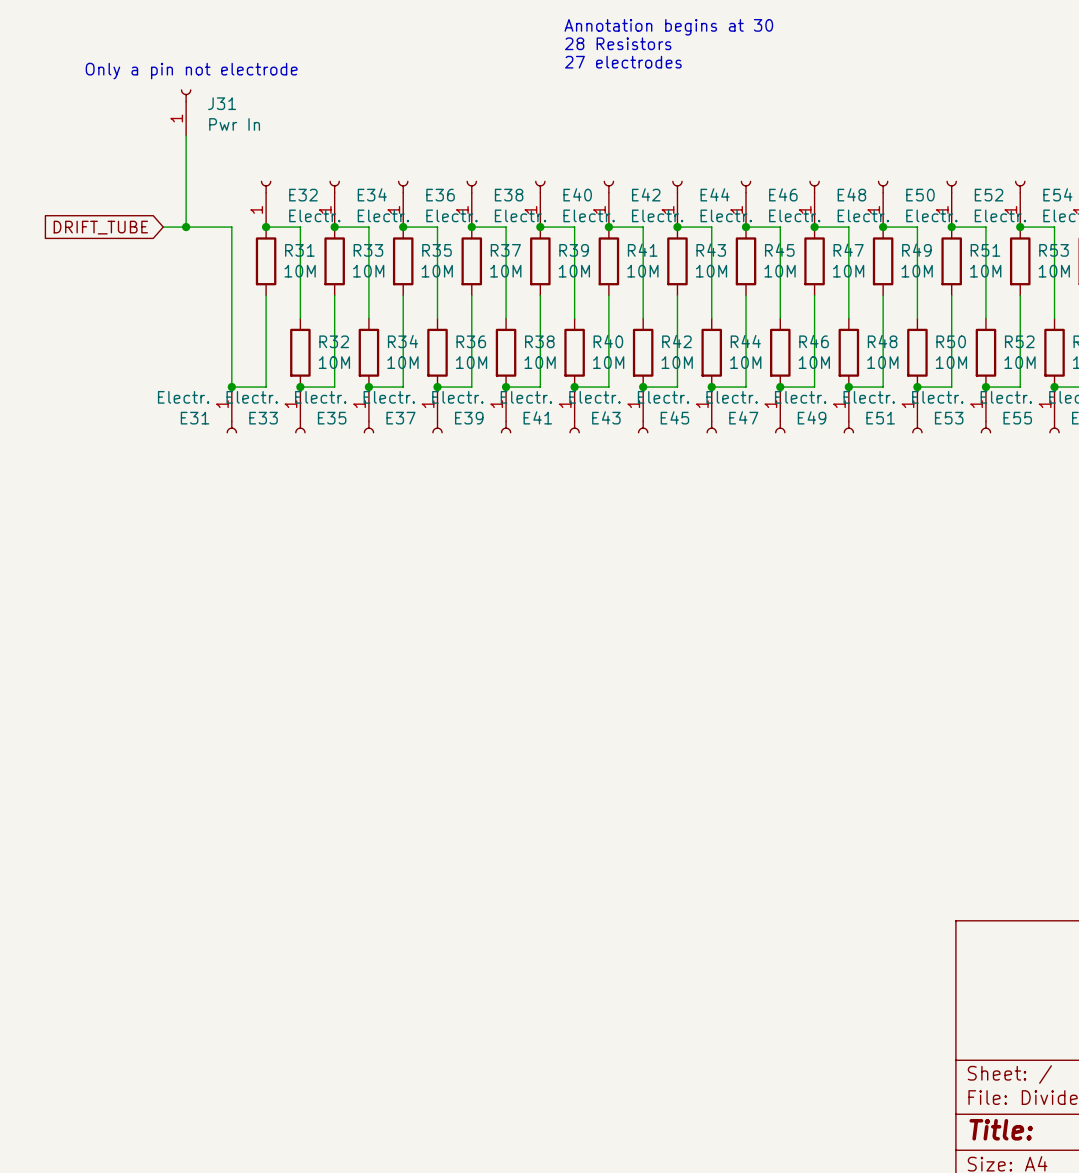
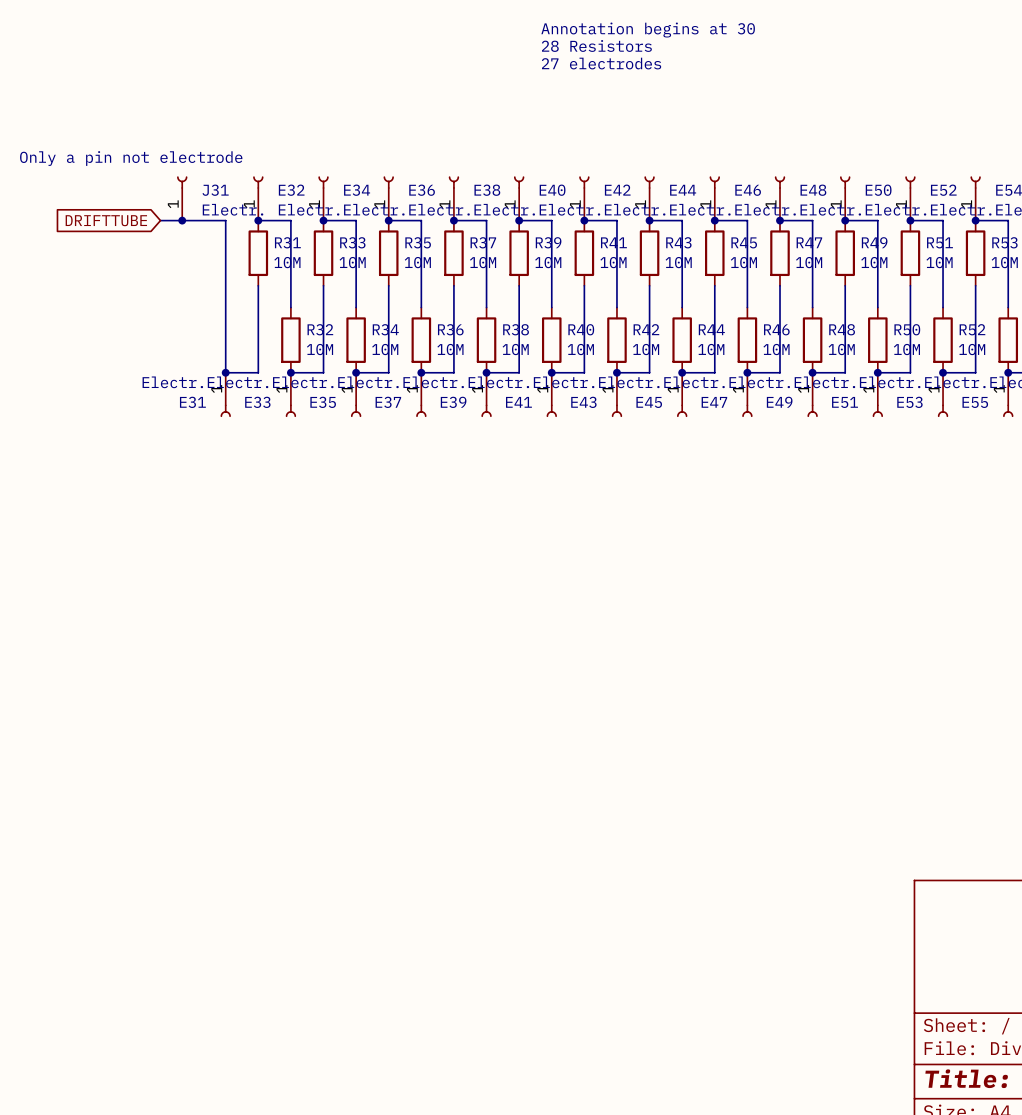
text position: Only a pin not electrode (191, 71) -> Only a pin not electrode (131, 158)
J31 position: (186, 112) -> (182, 198)
J31 value: Pwr In (234, 124) -> Electr. (233, 209)
wire: (186, 135) (186, 227) -> none
global label: DRIFT_TUBE (100, 227) -> DRIFTTUBE (106, 220)

